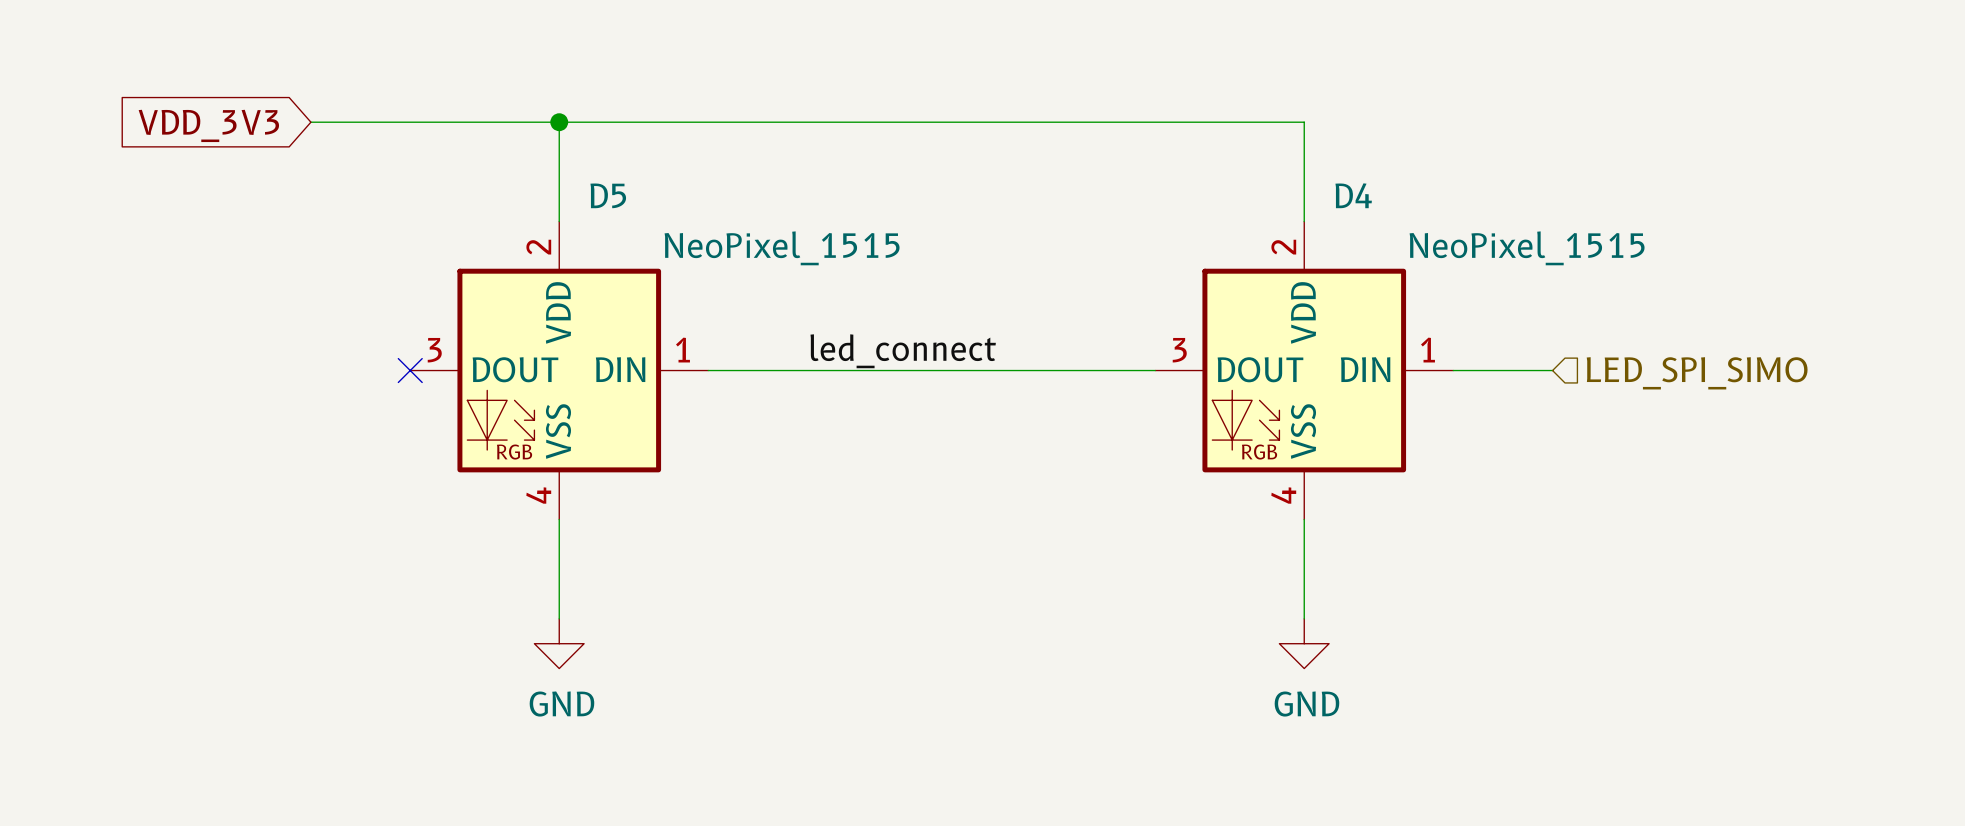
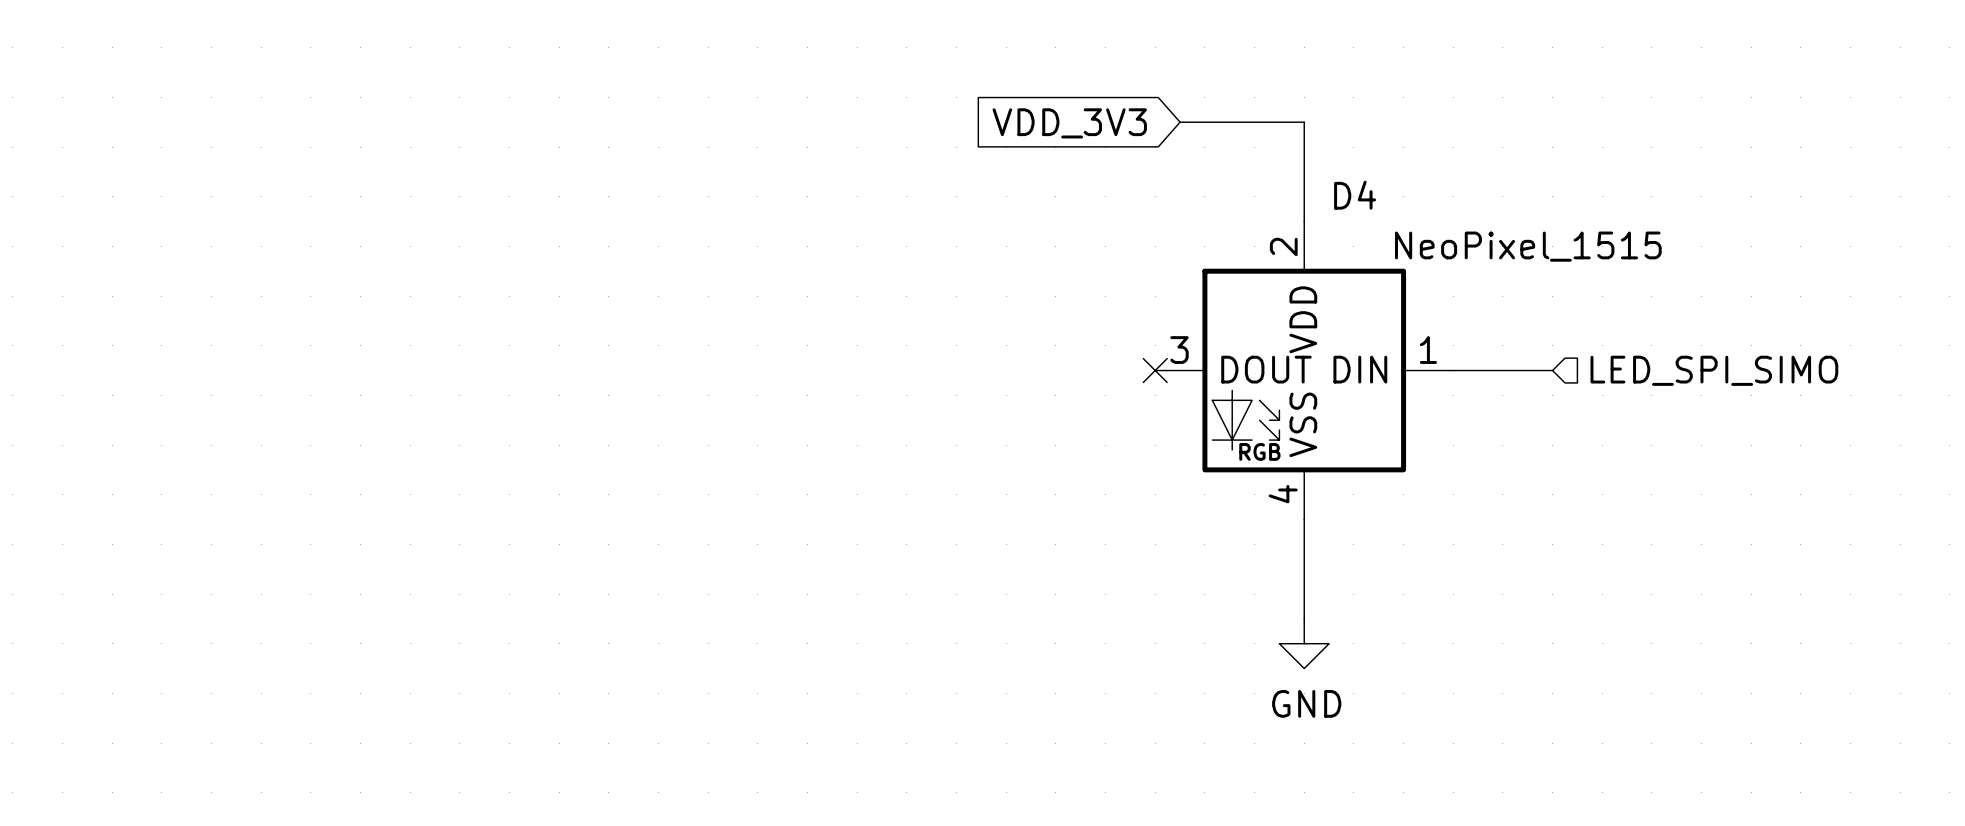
wire: (310, 122) (1180, 122) -> none
wire: (559, 122) (559, 221) -> none
junction: (559, 122) -> none
global label: VDD_3V3 (208, 125) -> none
global label: none -> VDD_3V3 (1069, 123)
label: led_connect (903, 351) -> none
no-connect mark: (410, 370) -> none
D5: NeoPixel_1515 (559, 370) -> none
wire: (708, 370) (1155, 370) -> none
no-connect mark: none -> (1155, 370)
wire: (559, 519) (559, 618) -> none
power symbol: GND (559, 643) -> none

